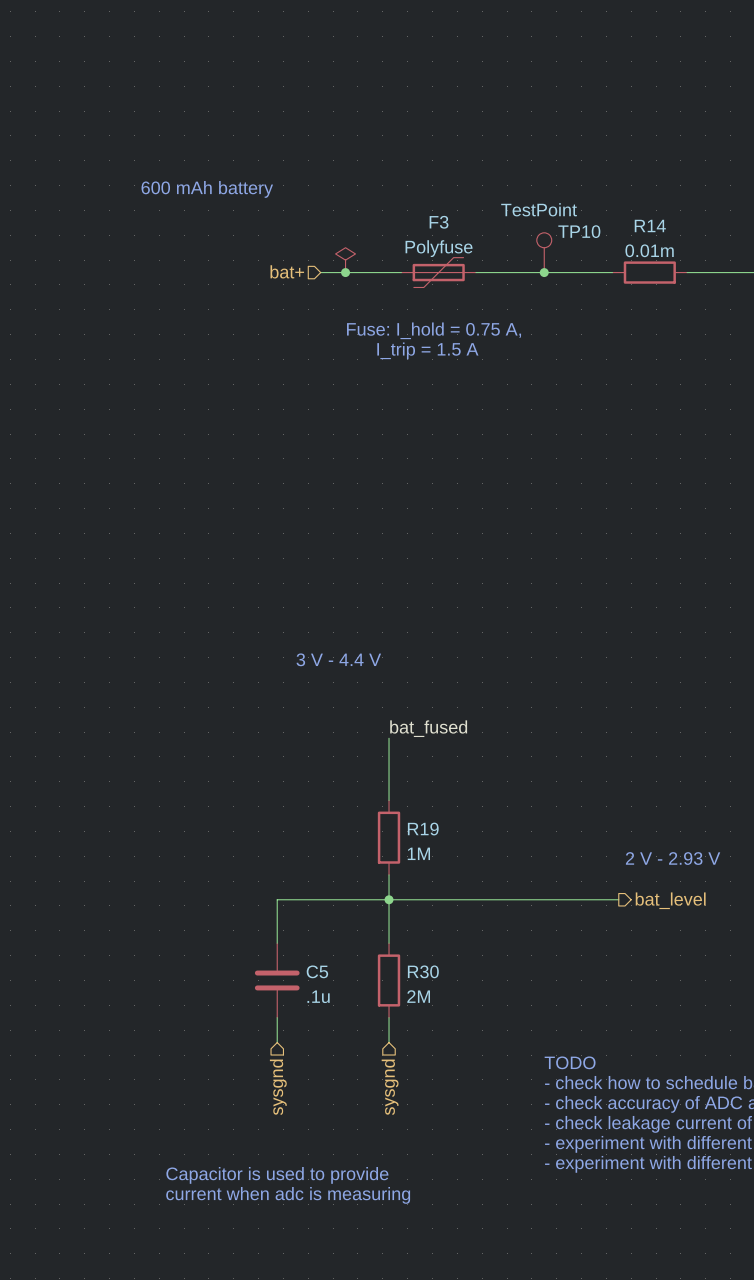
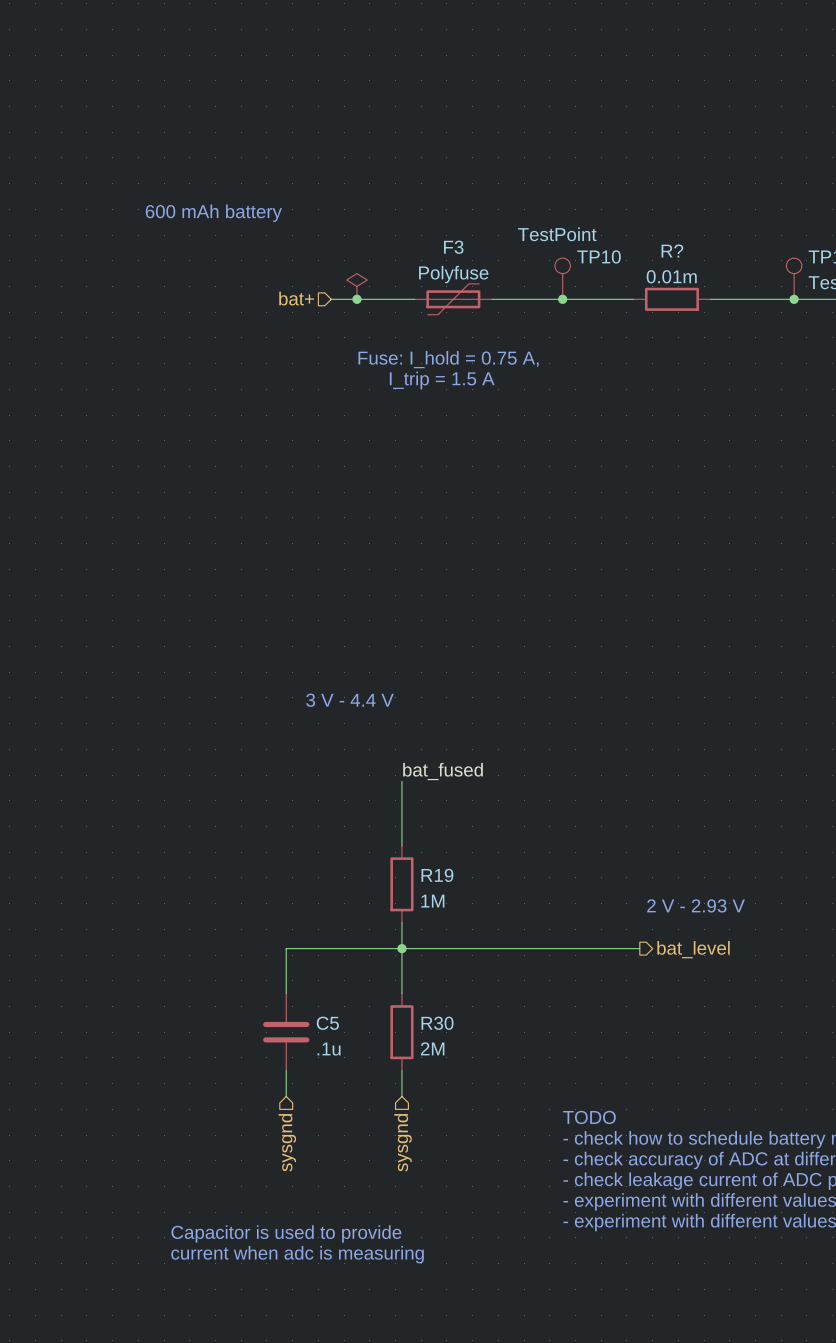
R14 name: R14 (650, 225) -> R? (672, 250)

